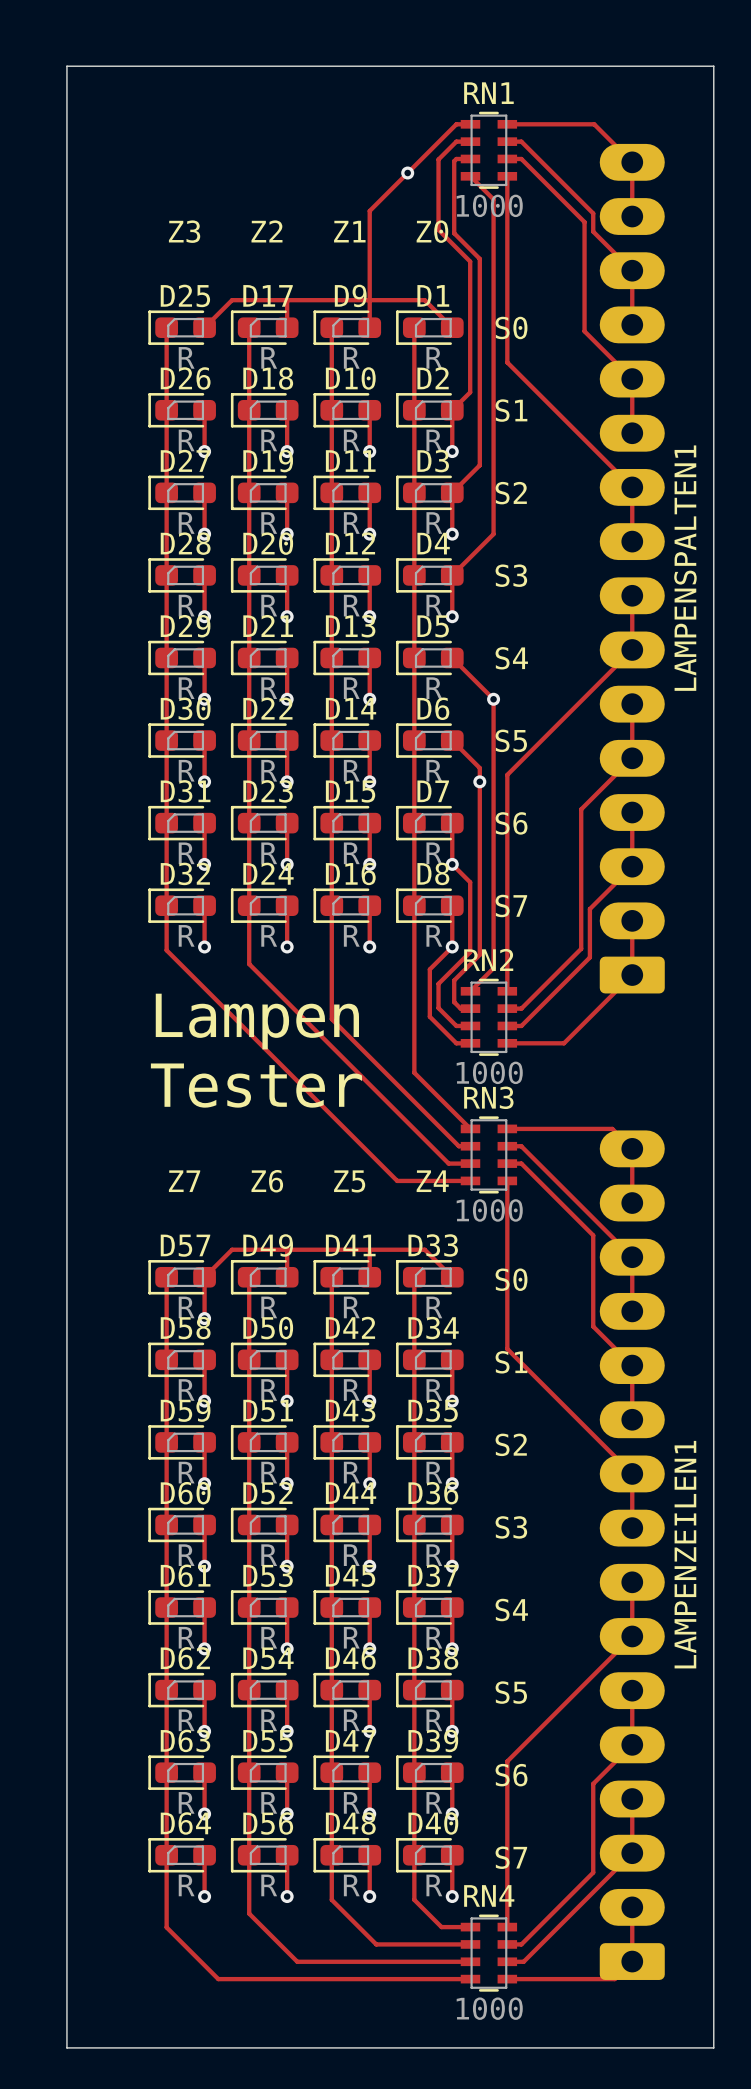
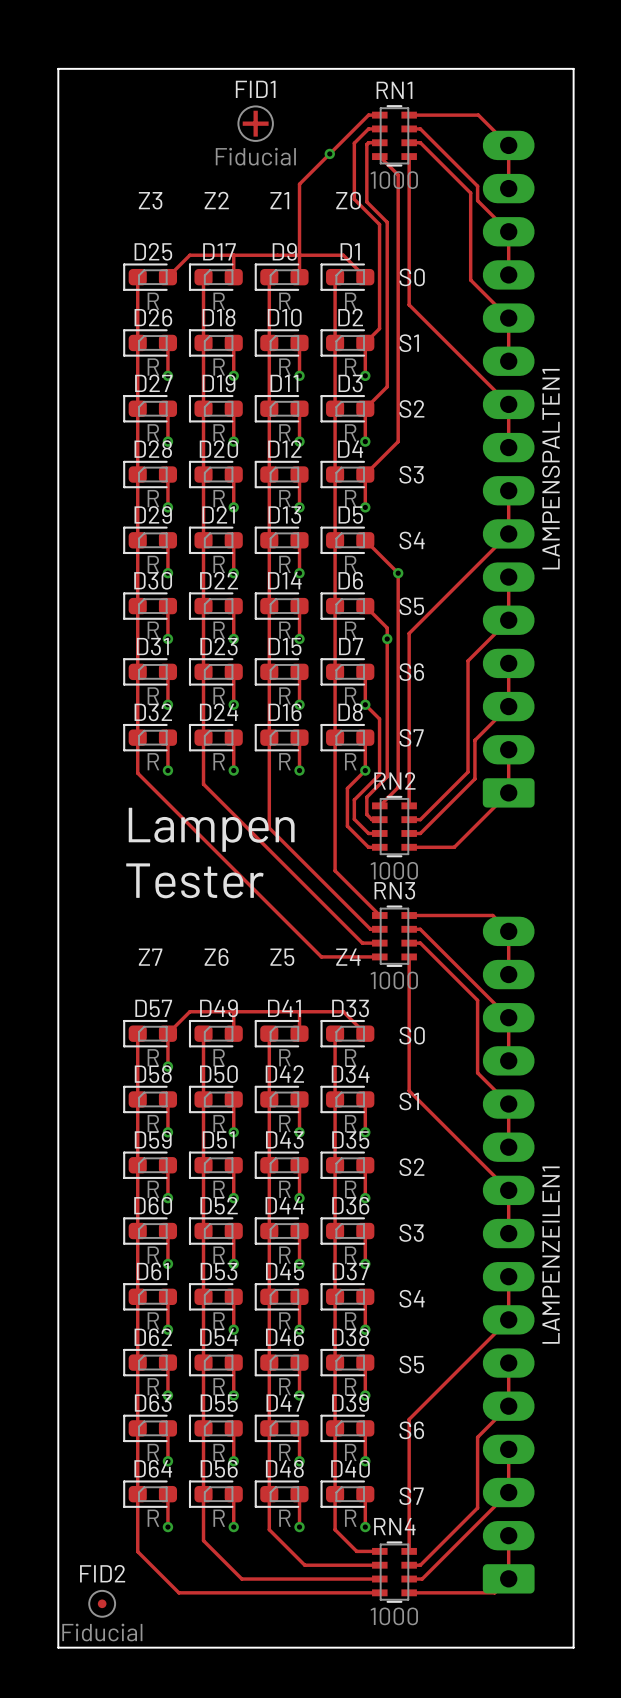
FID1: none -> Fiducial (255, 123)
FID2: none -> Fiducial (102, 1603)

